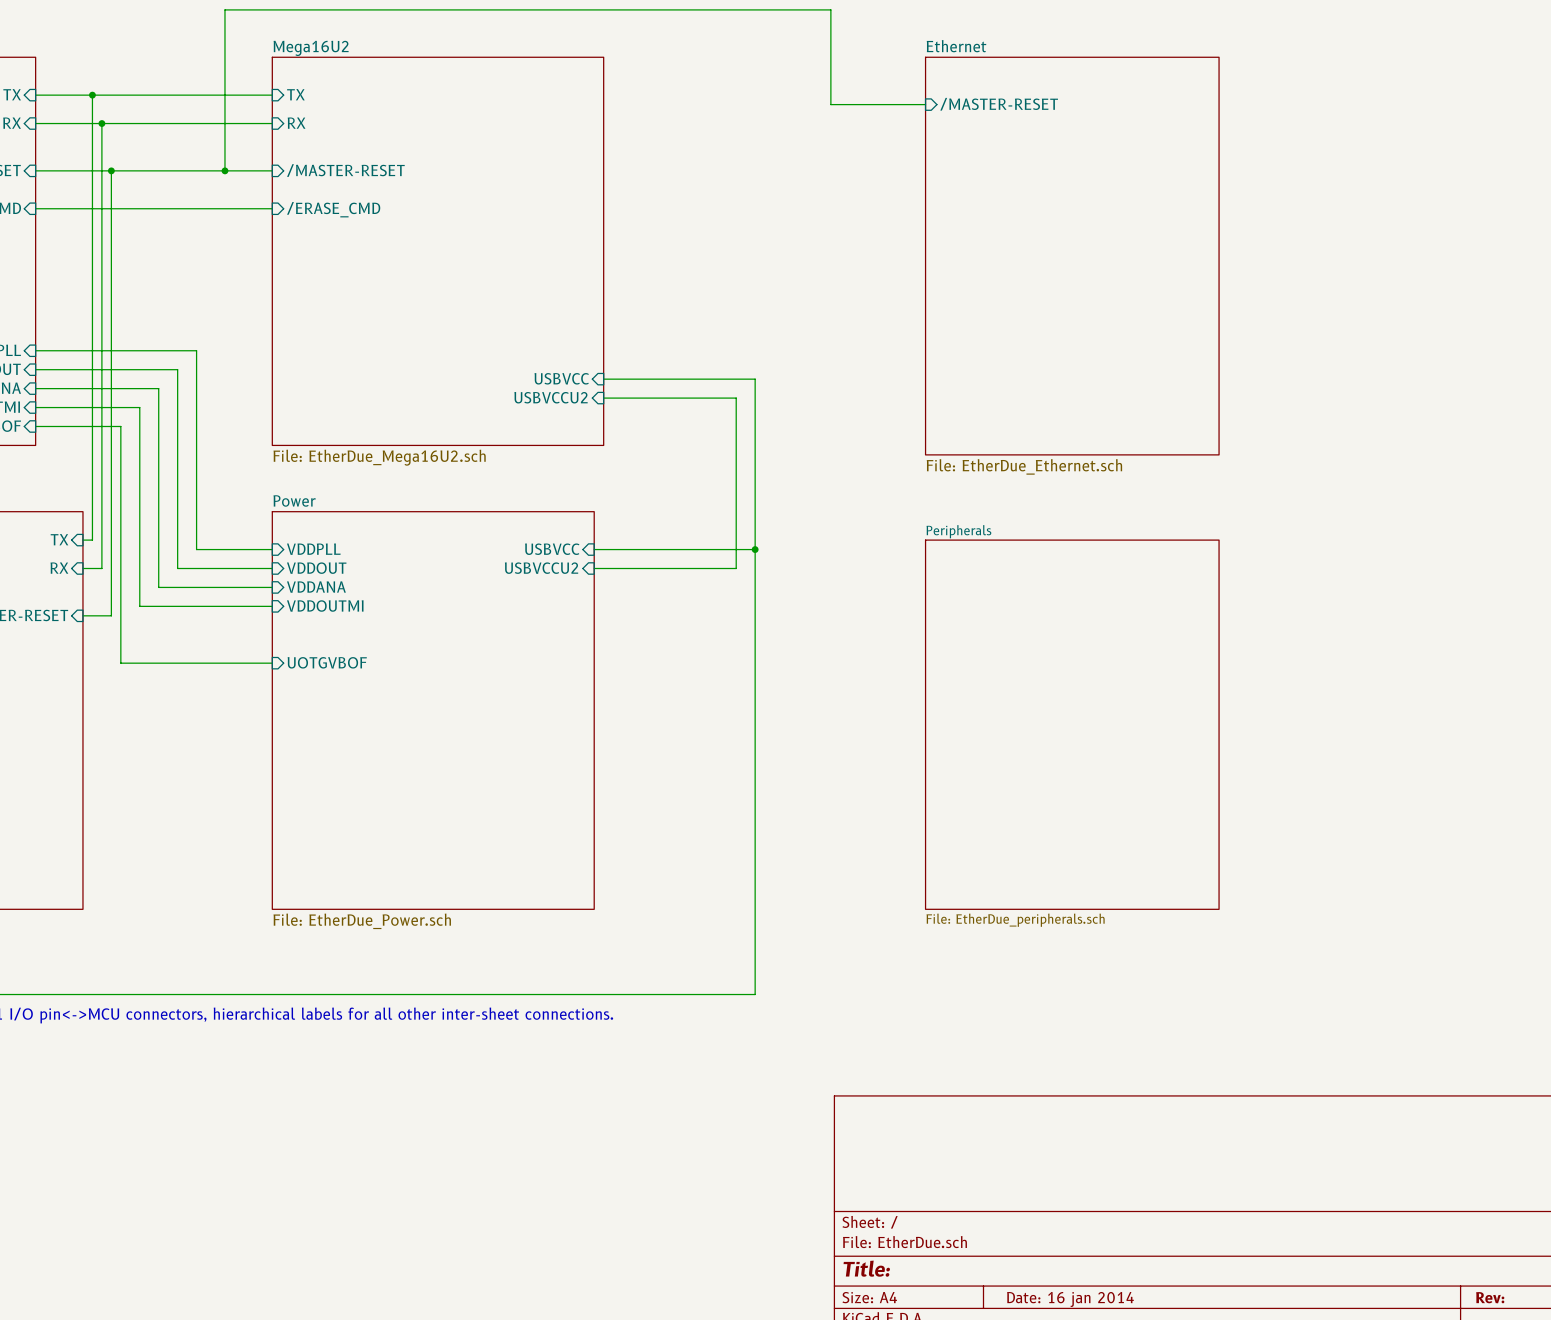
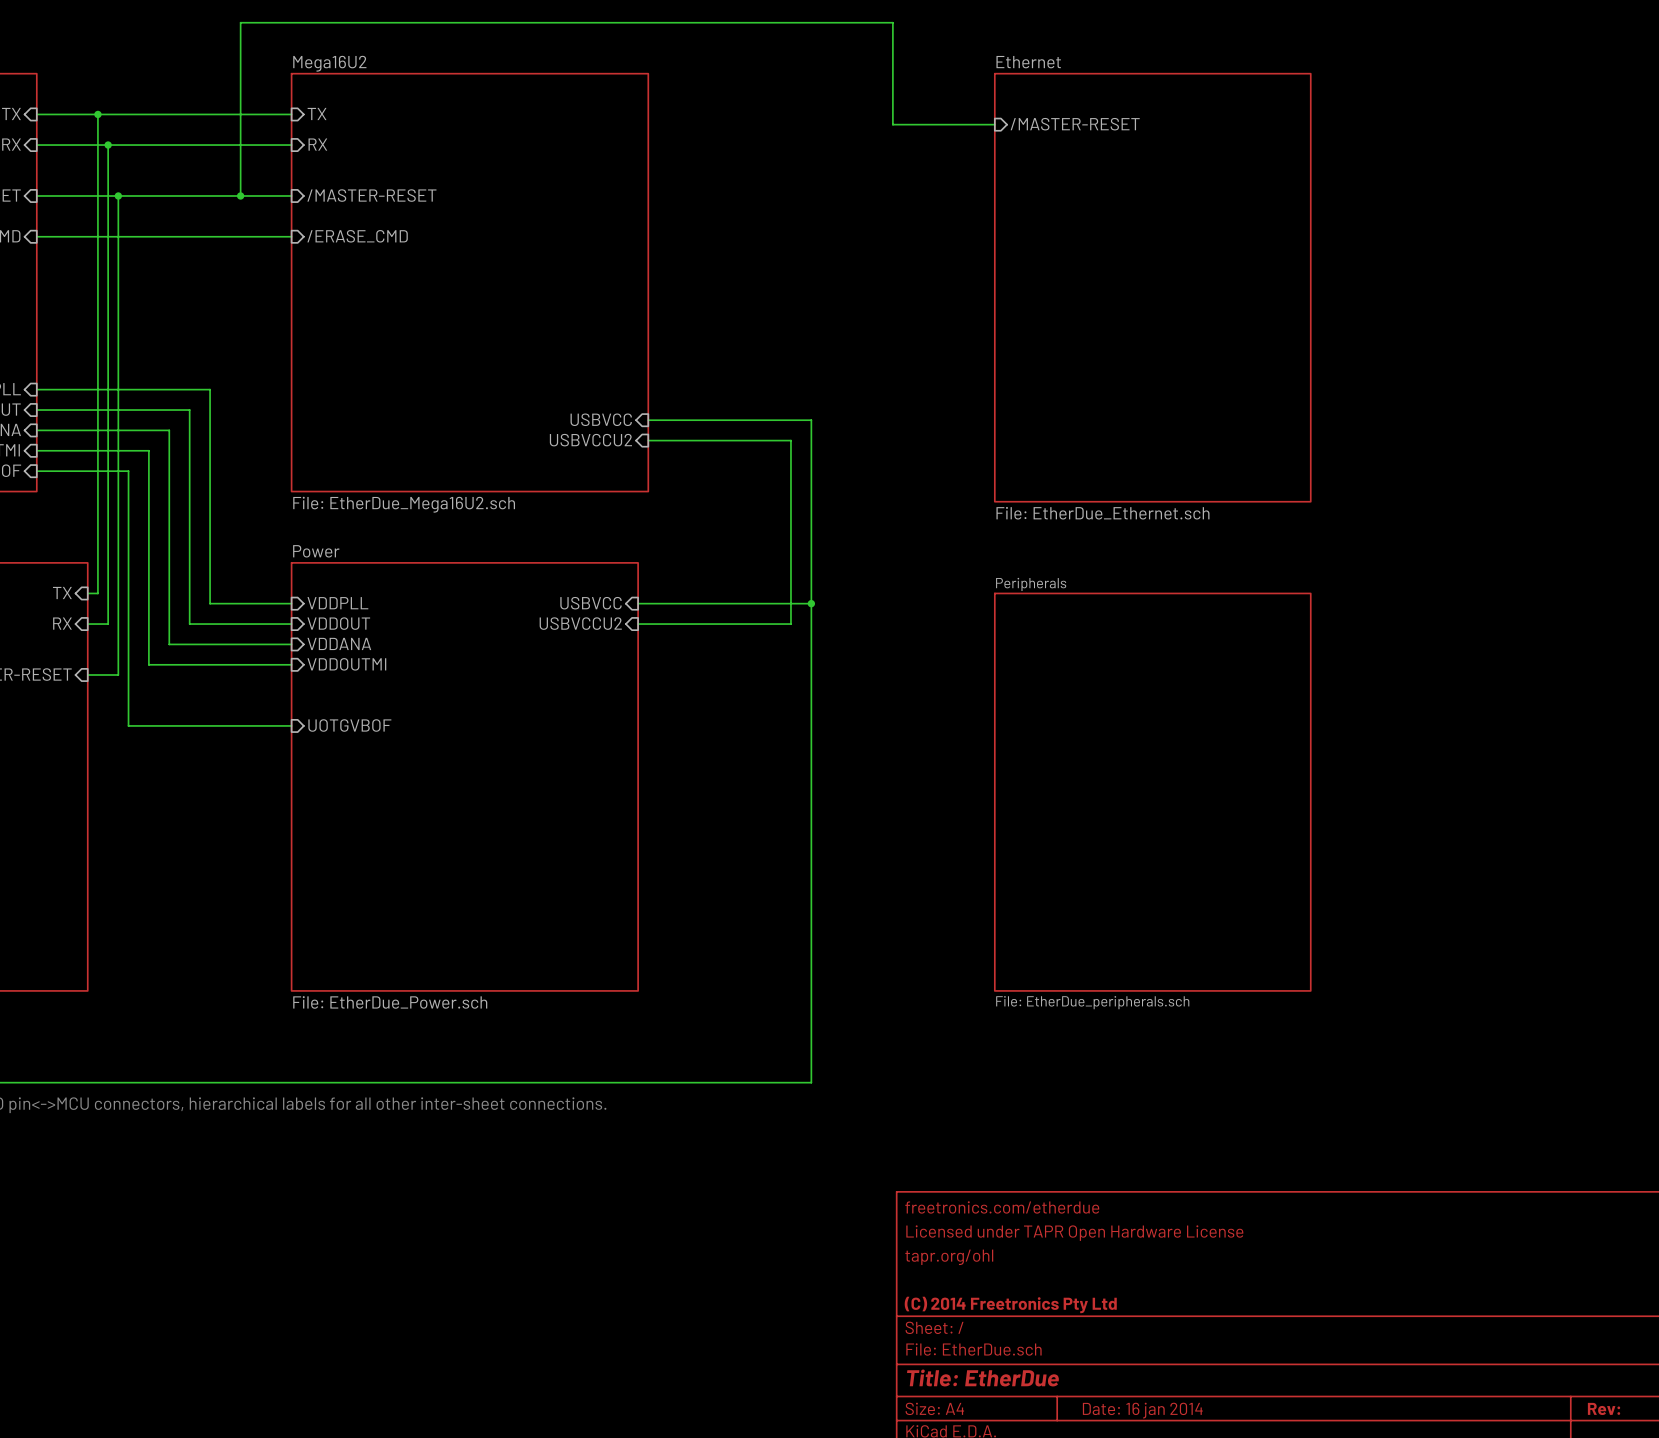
title block: none -> freetronics.com/etherdue (1002, 1207)
title block: none -> Licensed under TAPR Open Hardware License (1074, 1233)
title block: none -> tapr.org/ohl (949, 1257)
title block: none -> (C) 2014 Freetronics Pty Ltd (1010, 1304)
title block: Title: (866, 1268) -> Title: EtherDue (982, 1377)

